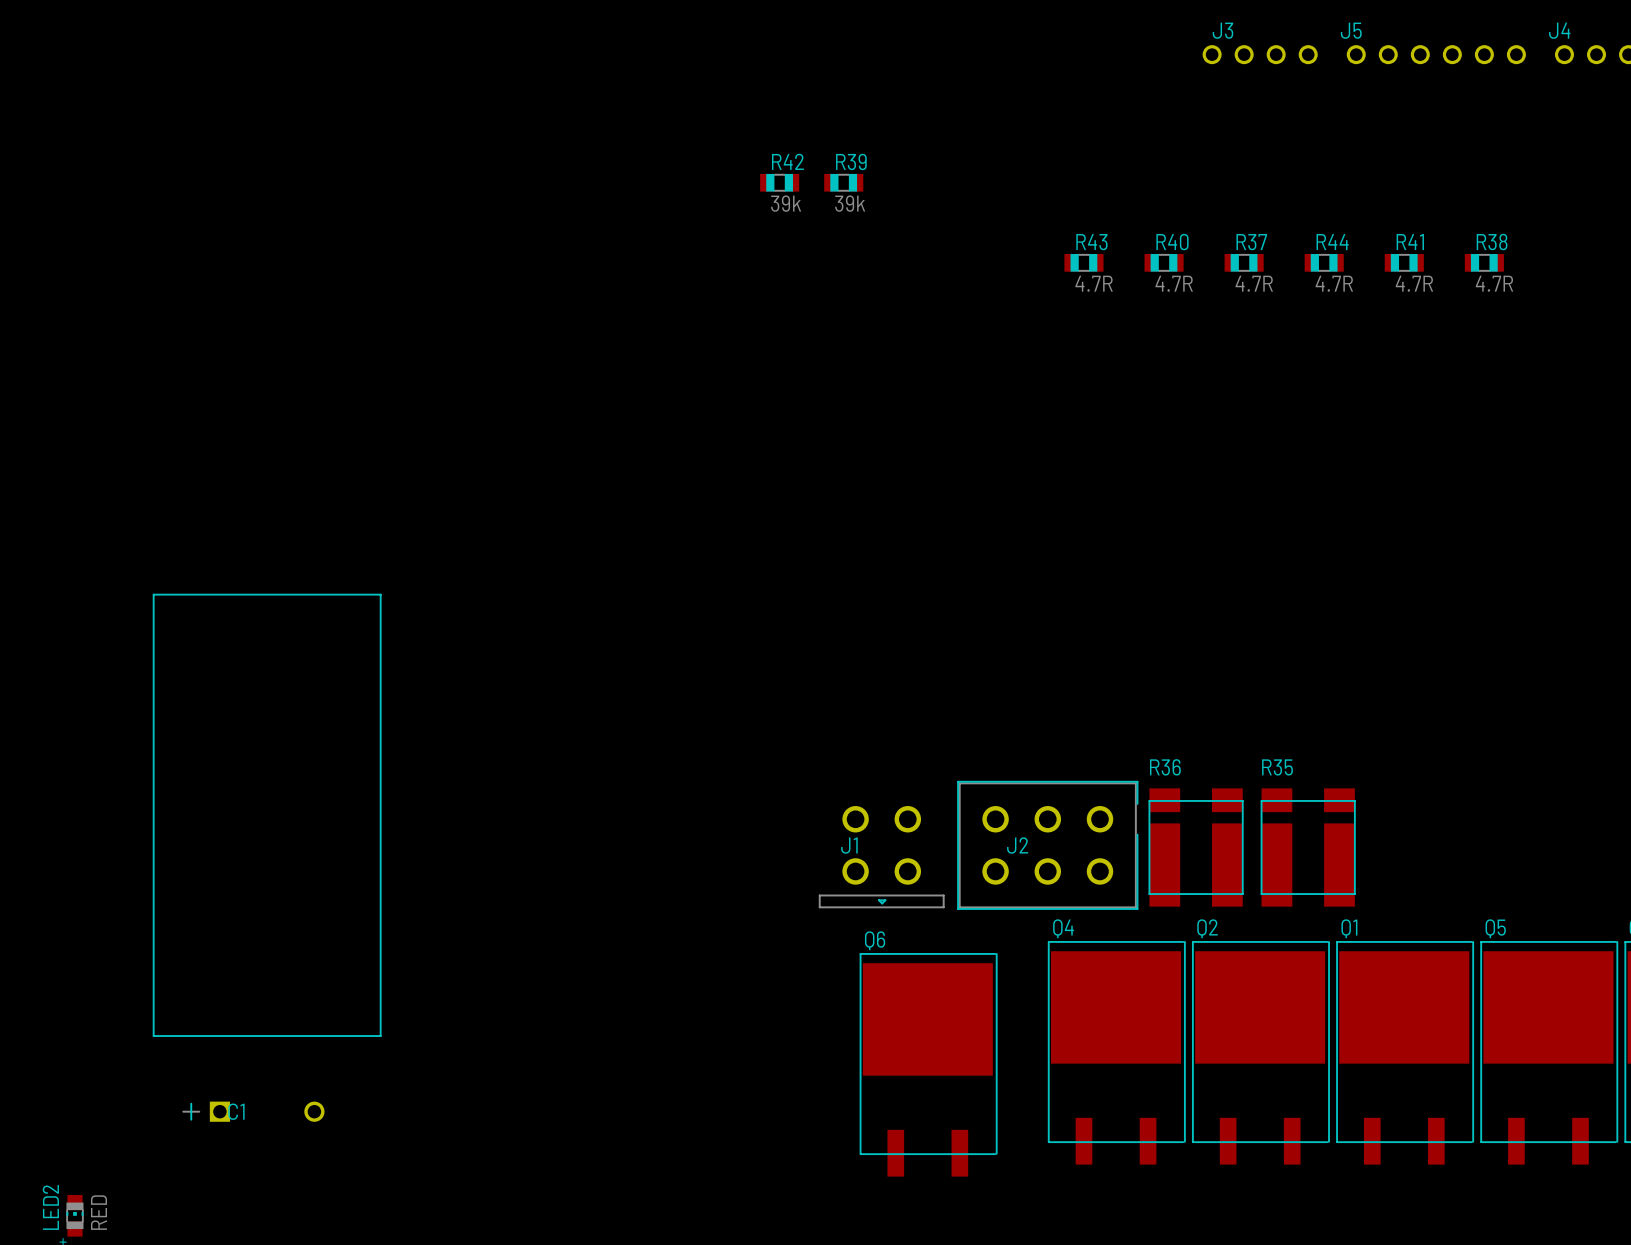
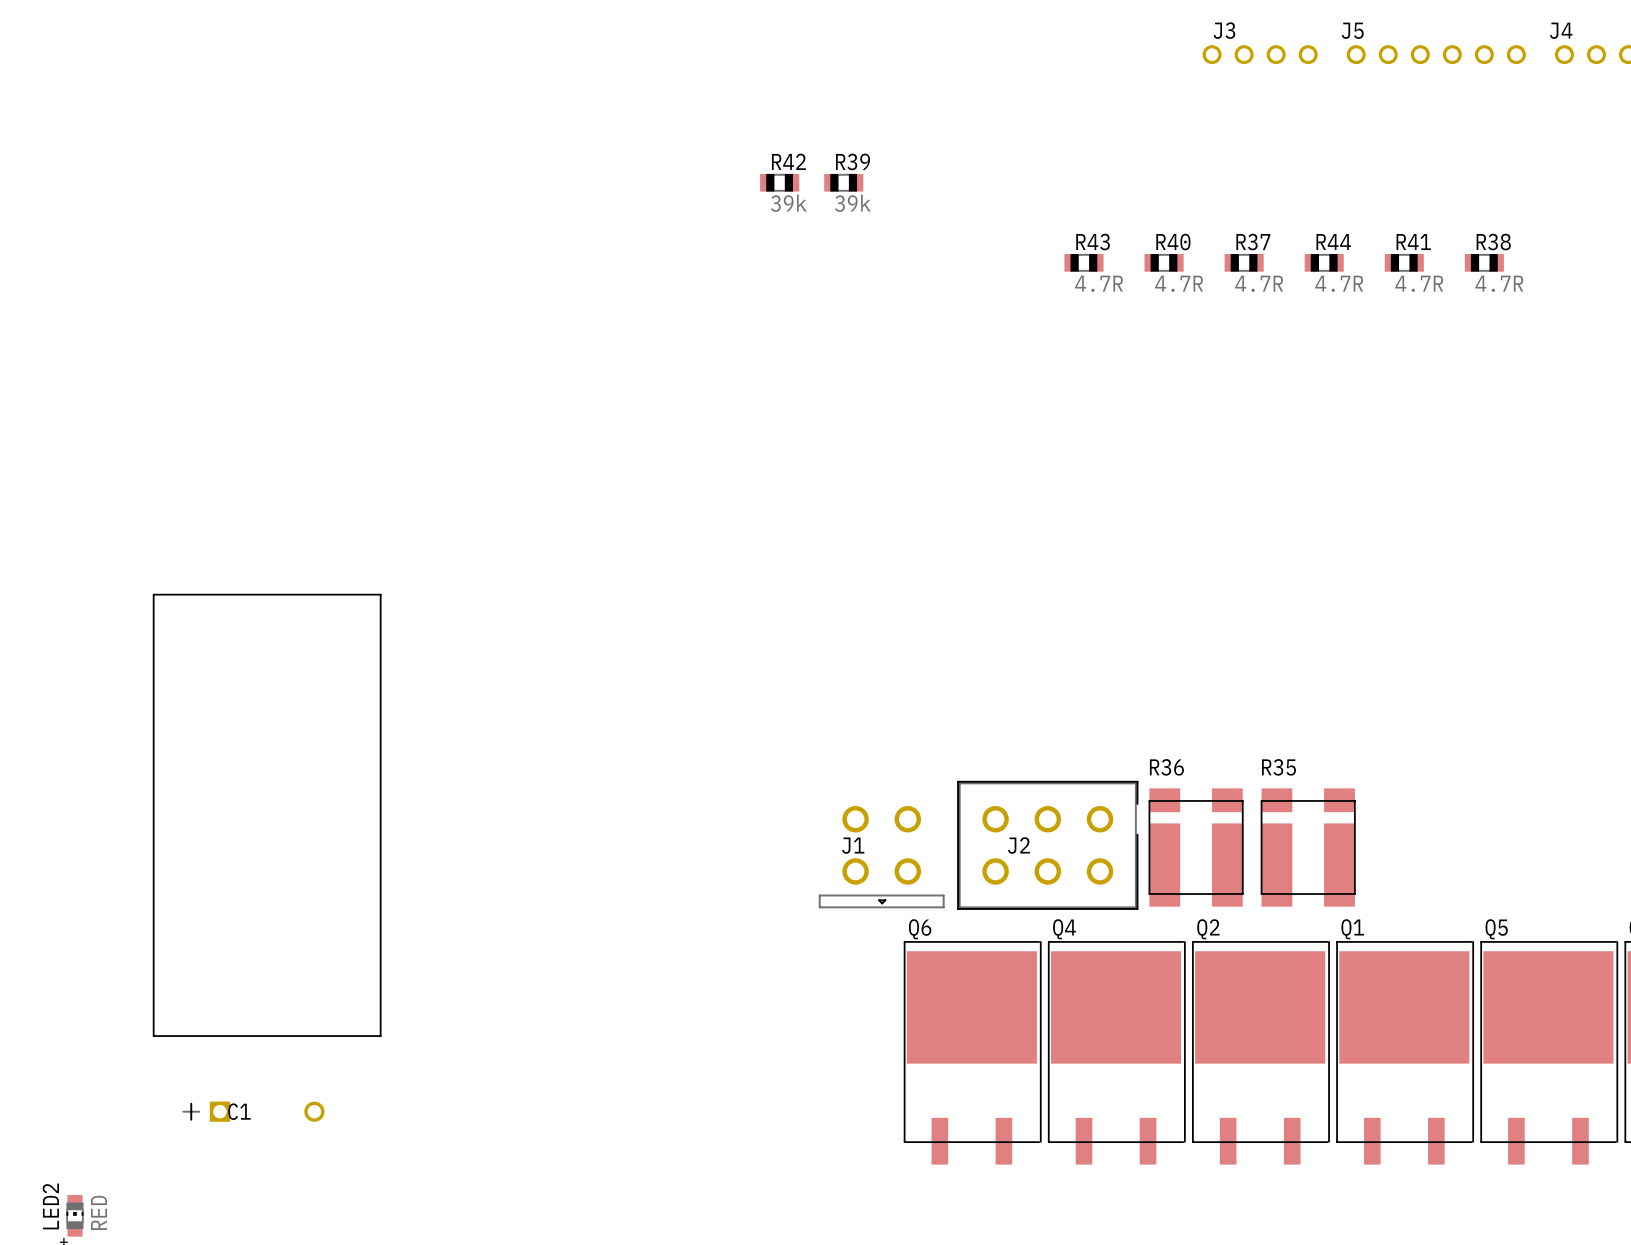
Q6 position: (928, 1064) -> (972, 1052)

